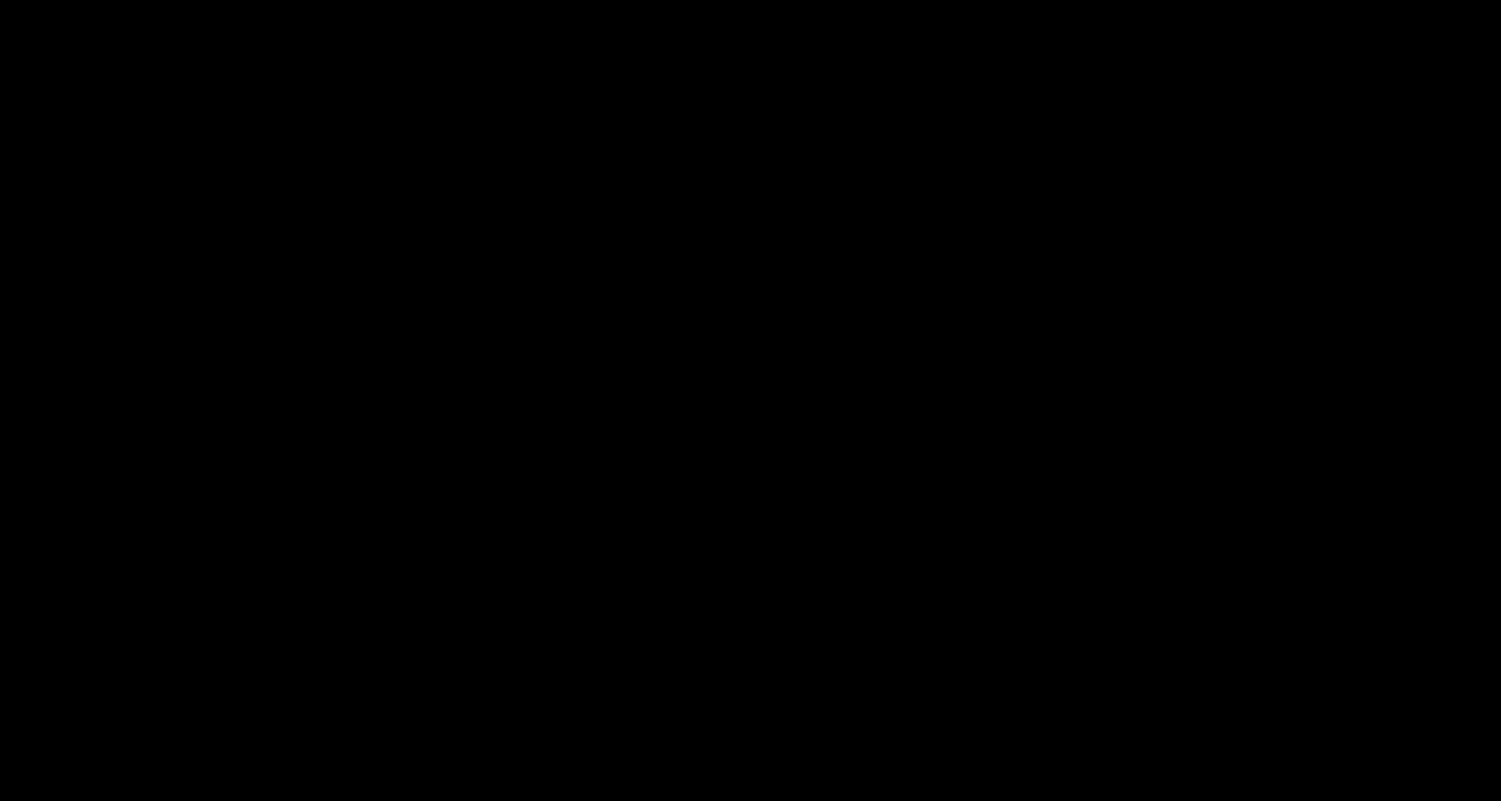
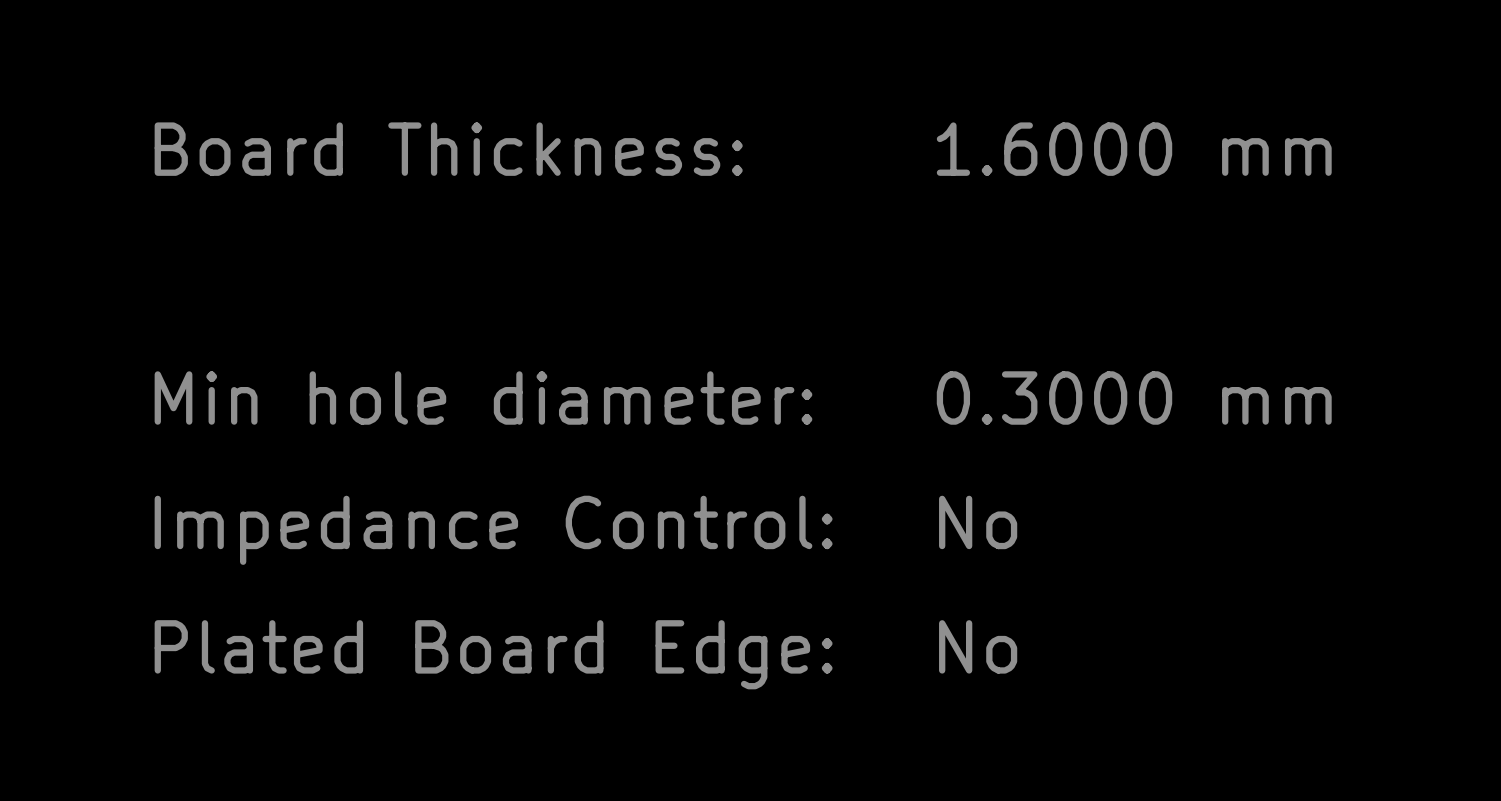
text: none -> Board Thickness: (448, 149)
text: none -> 1.6000 mm (1134, 149)
text: none -> Min hole diameter: (483, 398)
text: none -> 0.3000 mm (1134, 398)
text: none -> No (978, 522)
text: none -> Impedance Control: (493, 530)
text: none -> No (978, 646)
text: none -> Plated Board Edge: (493, 654)

